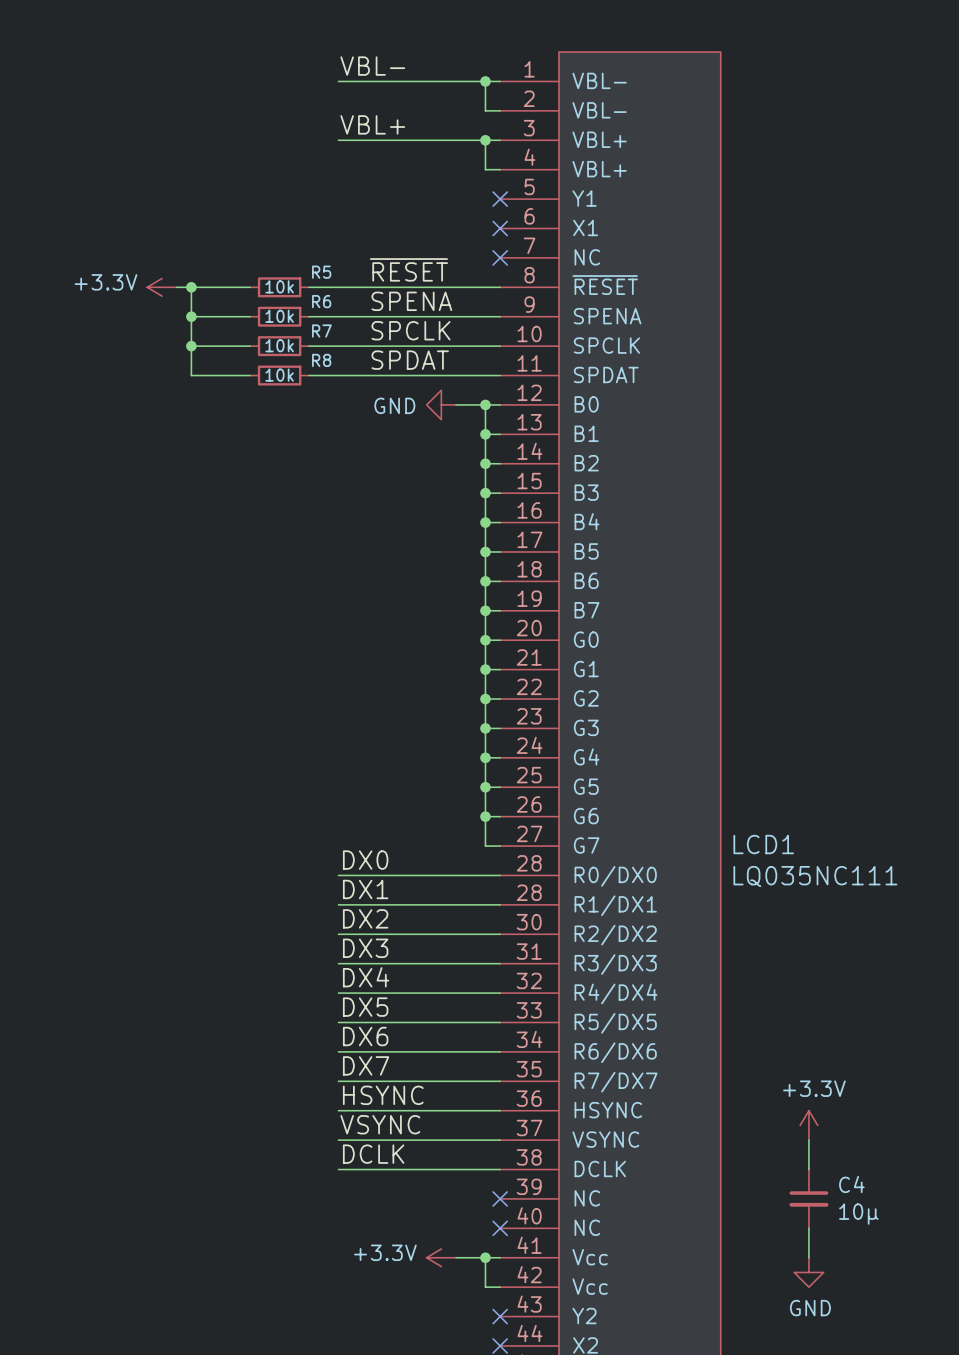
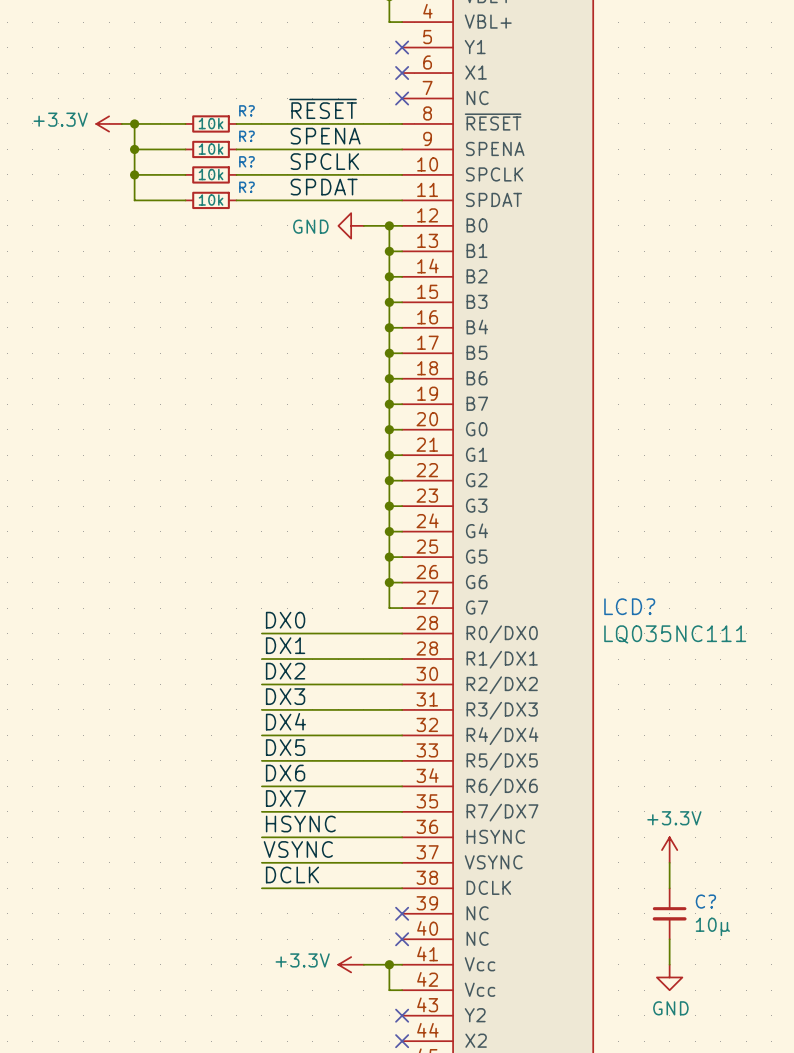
R5 name: R5 (321, 272) -> R? (246, 110)
R6 name: R6 (321, 301) -> R? (246, 136)
R7 name: R7 (321, 331) -> R? (246, 161)
R8 name: R8 (321, 360) -> R? (246, 187)
LCD1 name: LCD1 (763, 844) -> LCD? (629, 606)
C4 name: C4 (851, 1184) -> C? (705, 901)

